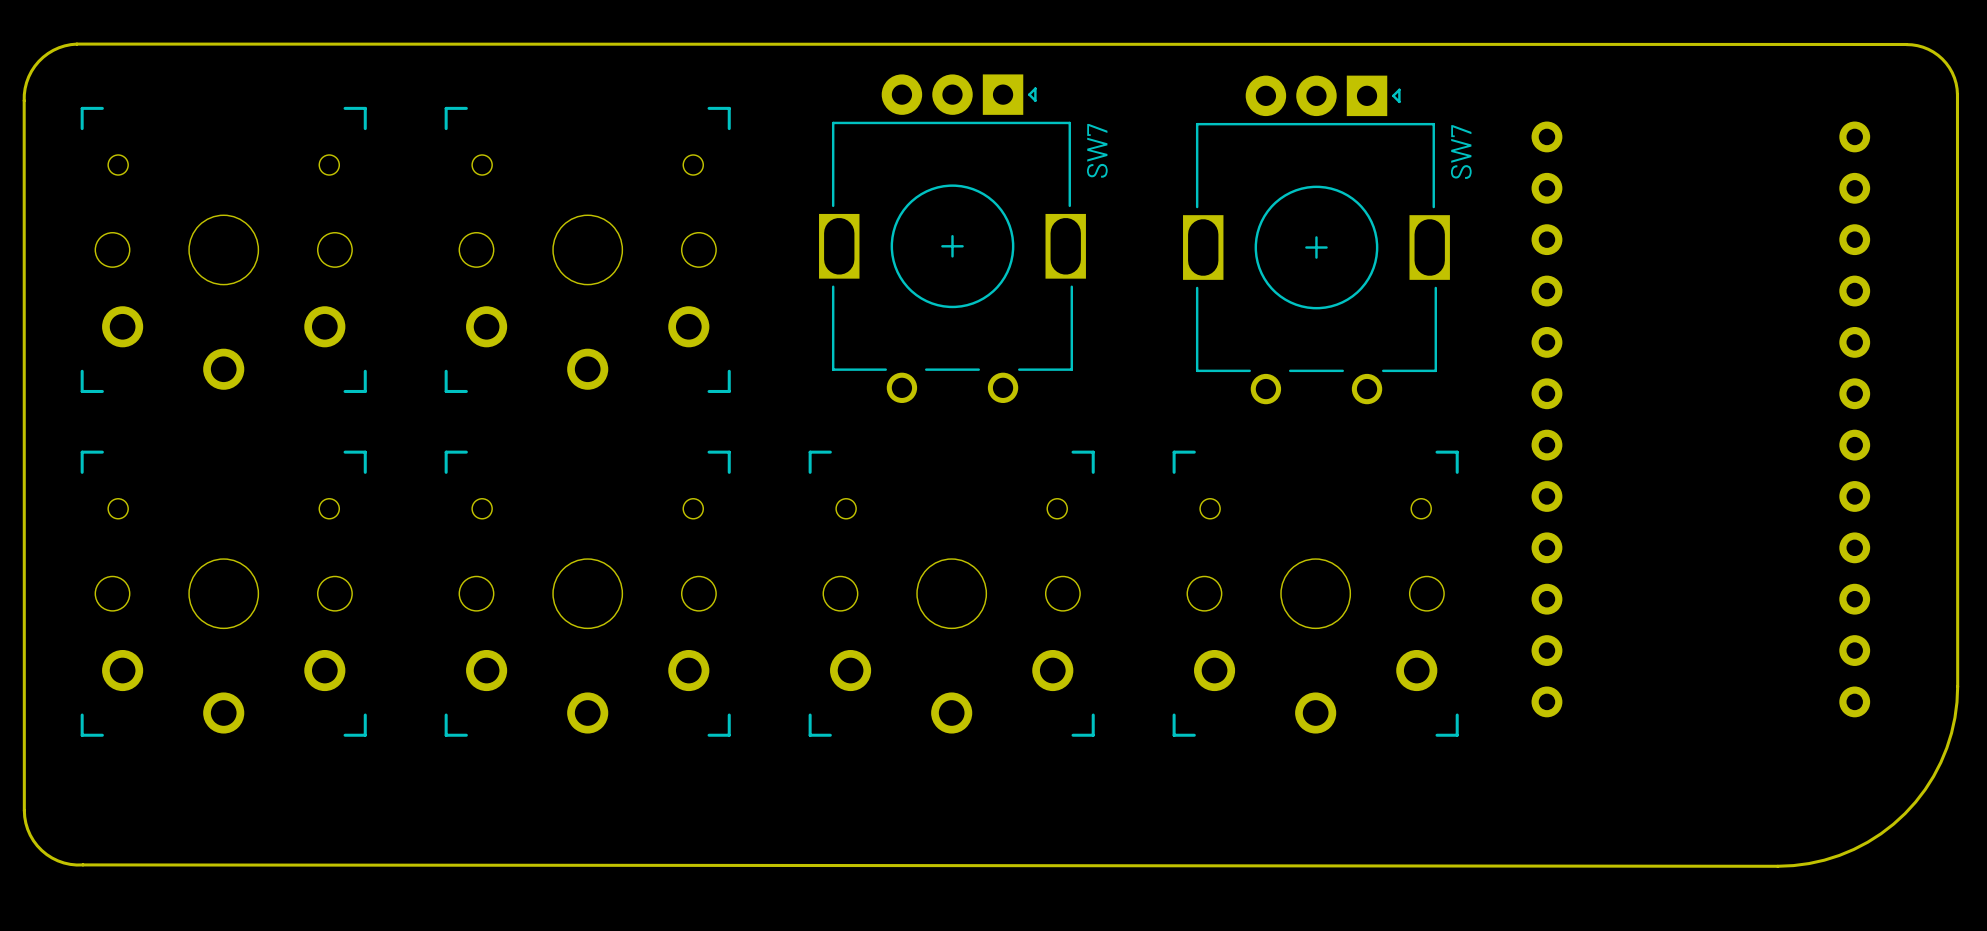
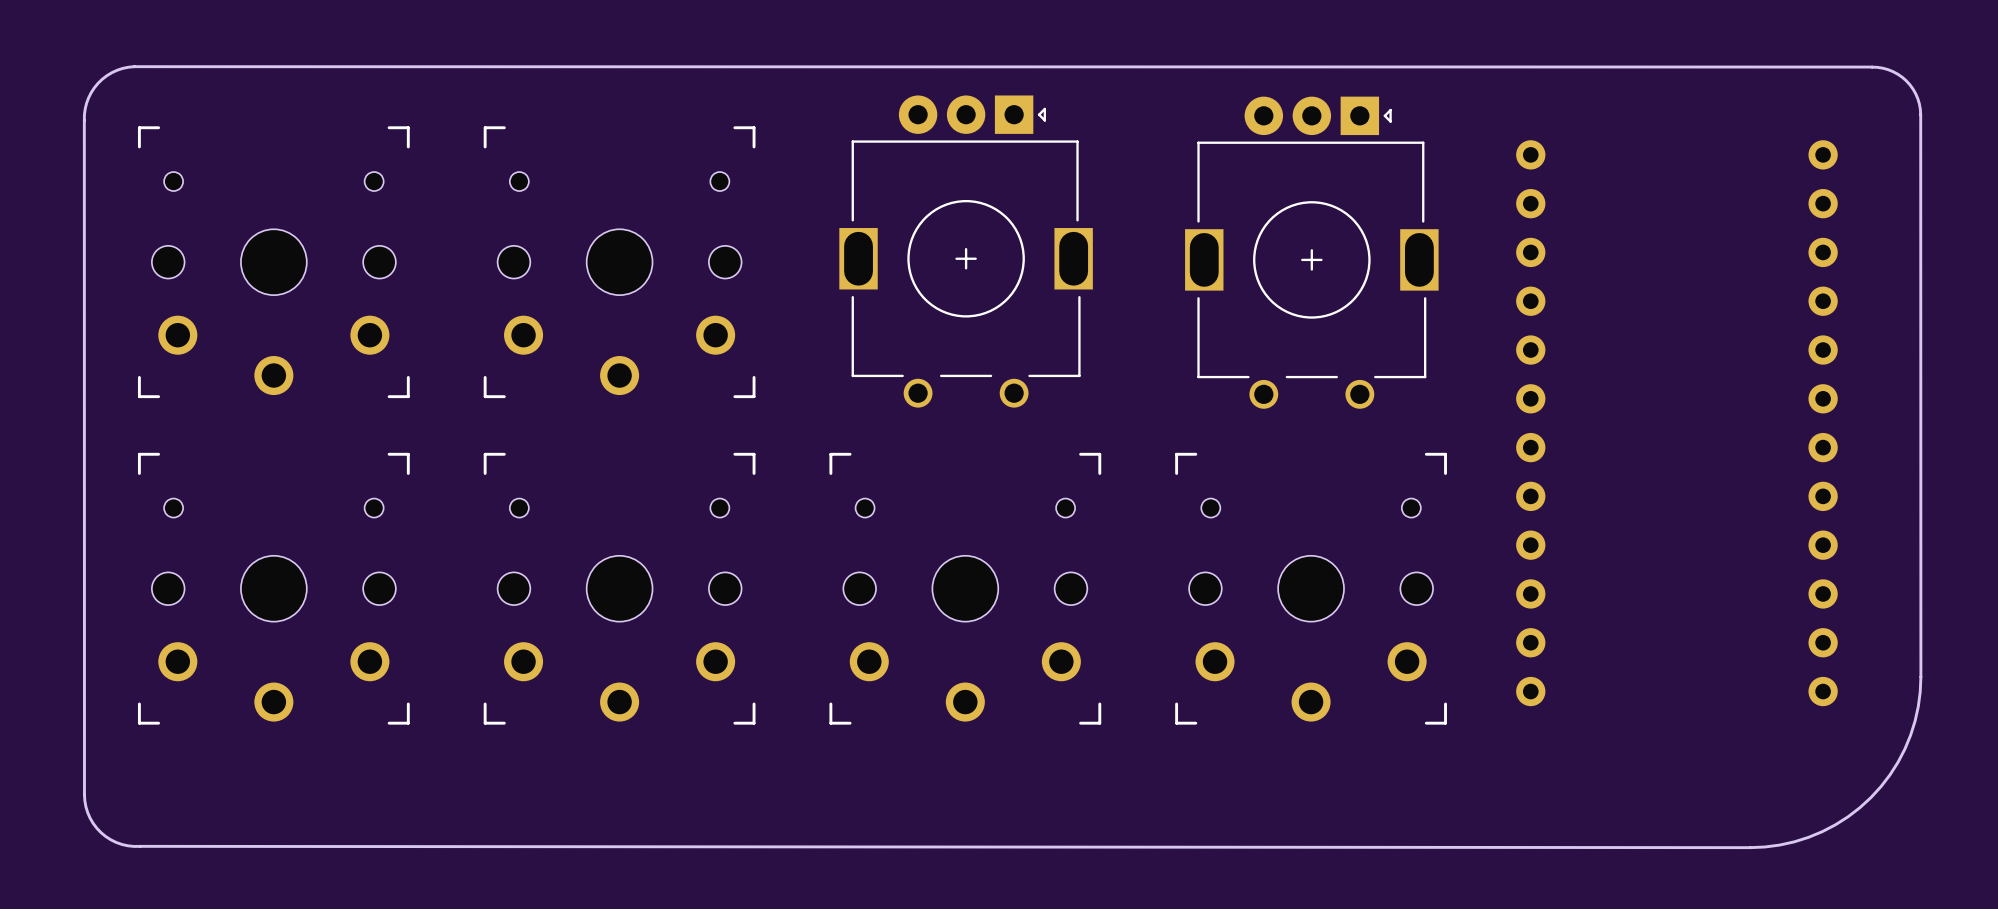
SW7 name: SW7 (1097, 150) -> none
SW7 name: SW7 (1461, 152) -> none

